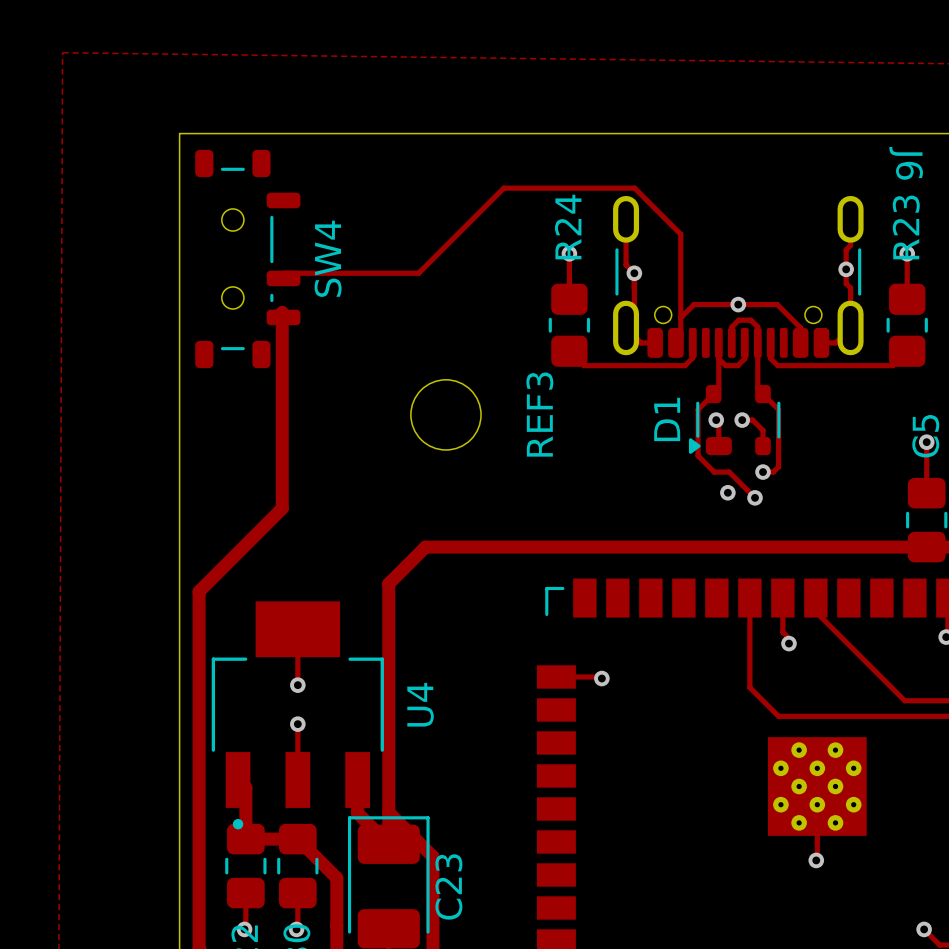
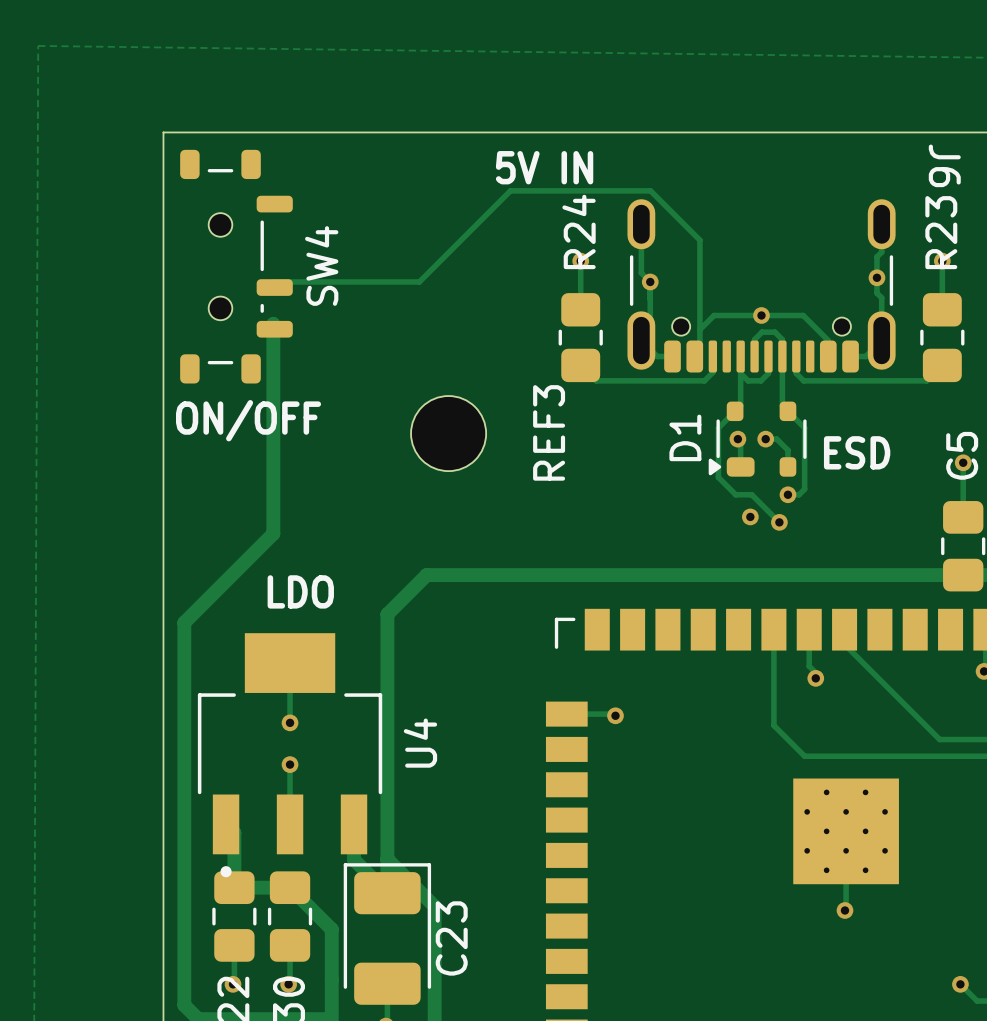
text: none -> 5V IN (544, 167)
text: none -> ON/OFF (248, 420)
text: none -> ESD (857, 452)
text: none -> LDO (300, 591)

